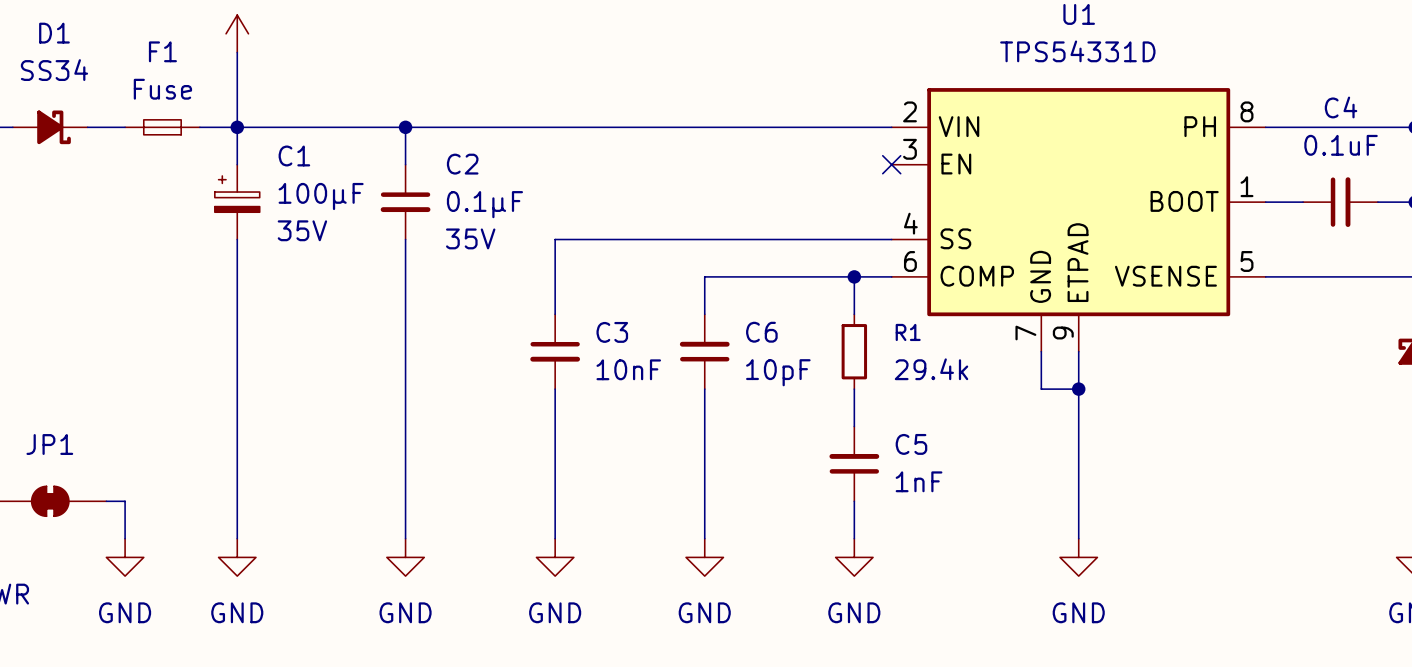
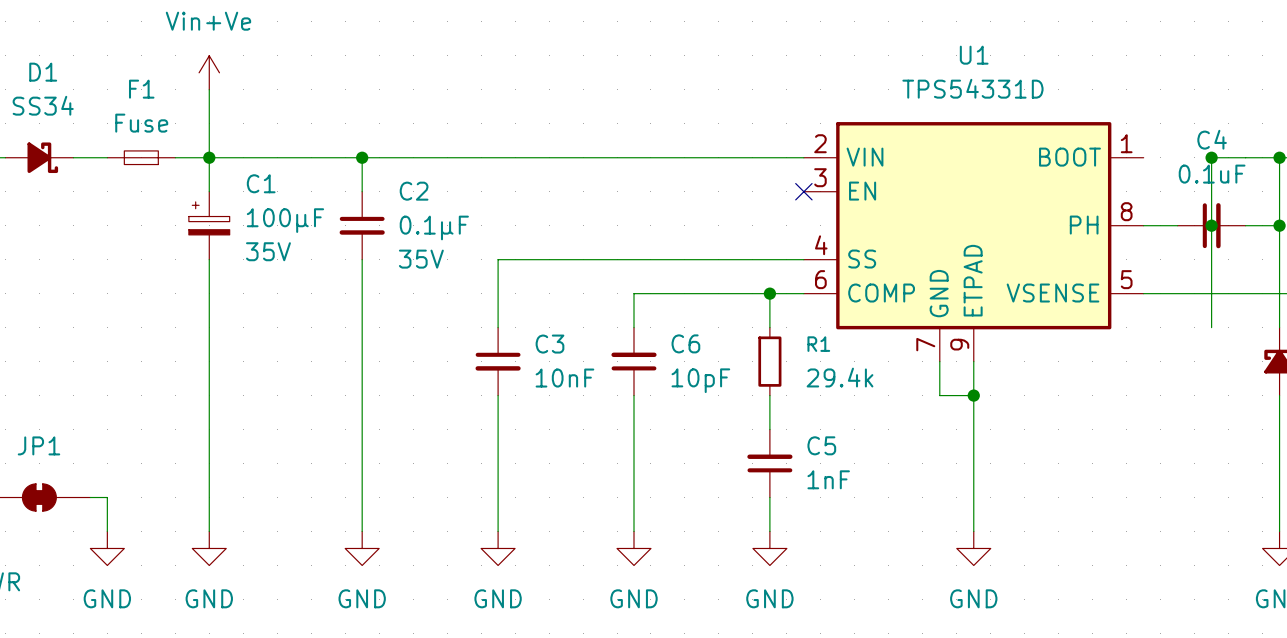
U1 pin number: 8 (1247, 111) -> 1 (1126, 143)
U1 pin name: PH (1200, 126) -> BOOT (1069, 157)
wire: (1265, 127) (1340, 127) -> (1211, 327) (1211, 157)
junction: none -> (1211, 157)
U1 pin number: 1 (1247, 186) -> 8 (1126, 211)
U1 pin name: BOOT (1184, 201) -> PH (1084, 225)
junction: none -> (1211, 225)

